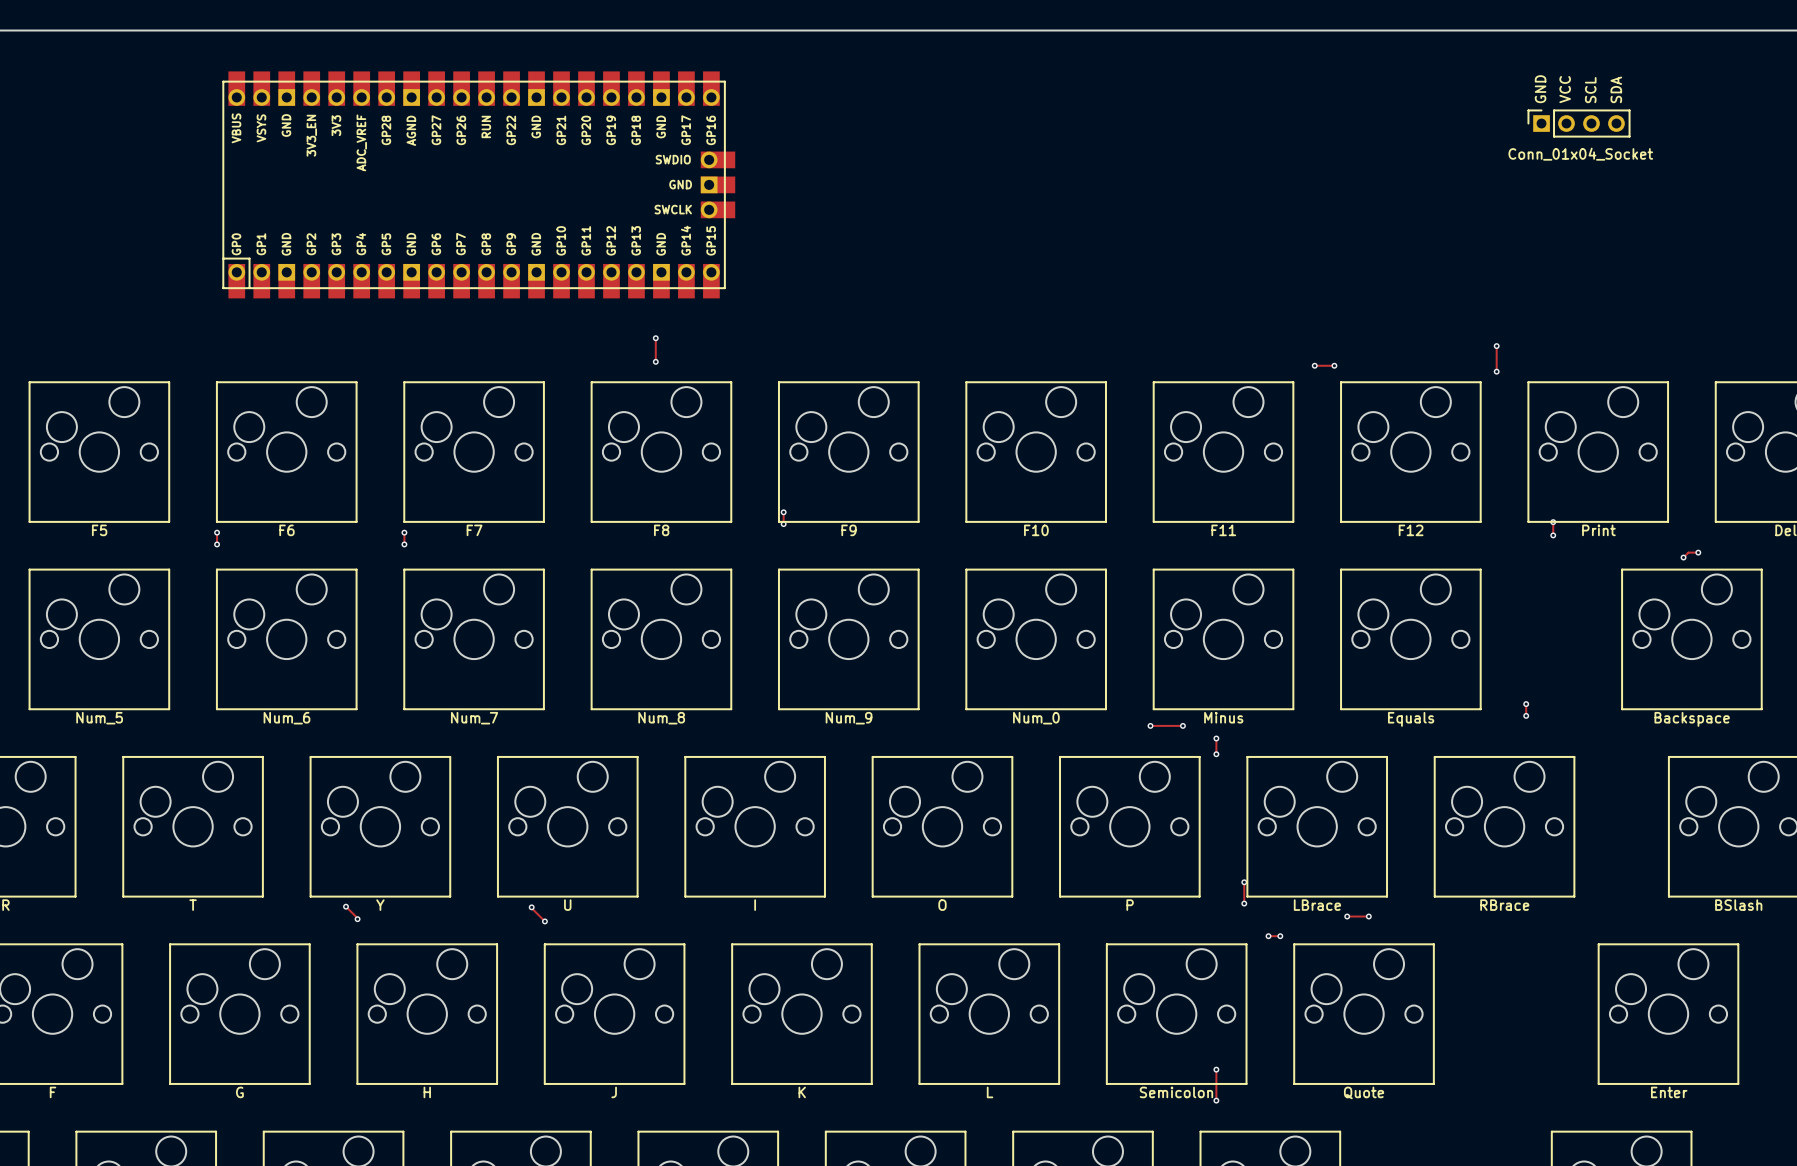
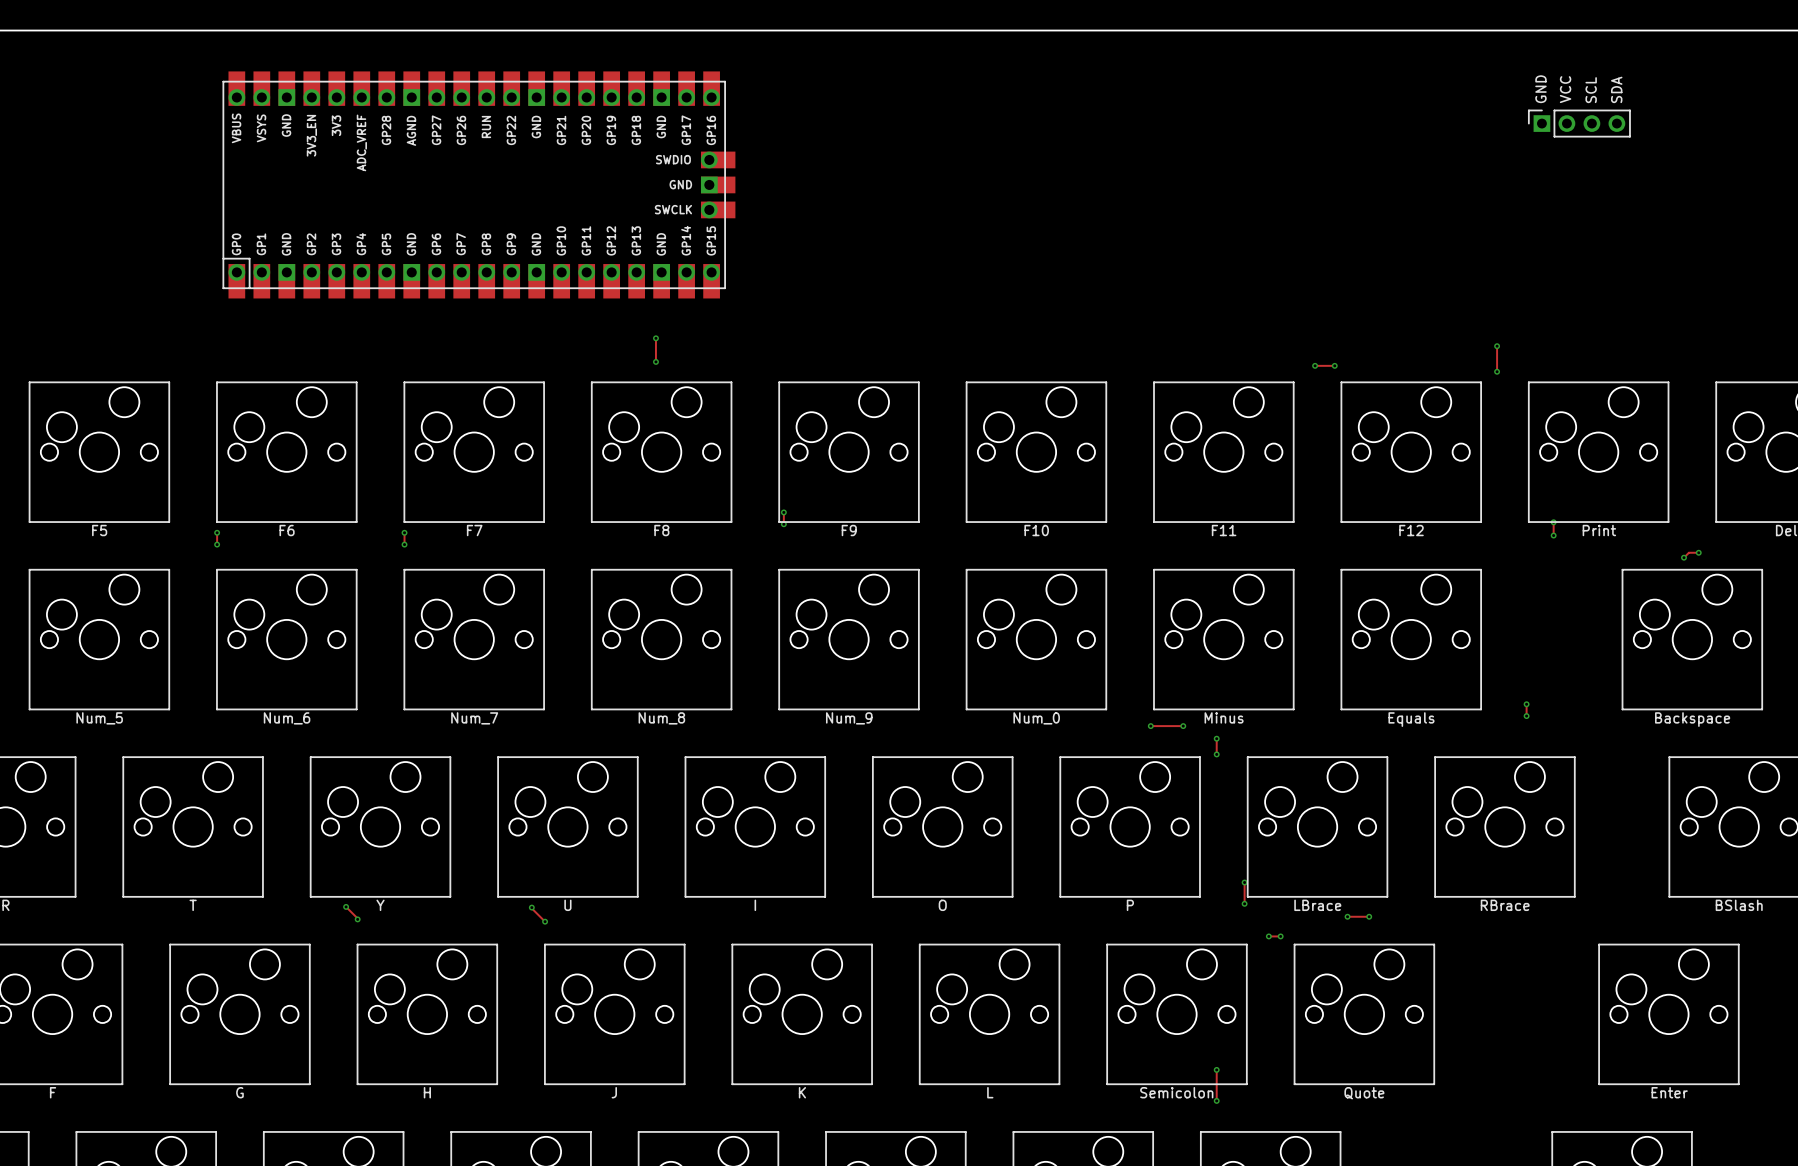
part value: Conn_01x04_Socket (1580, 154) -> none

